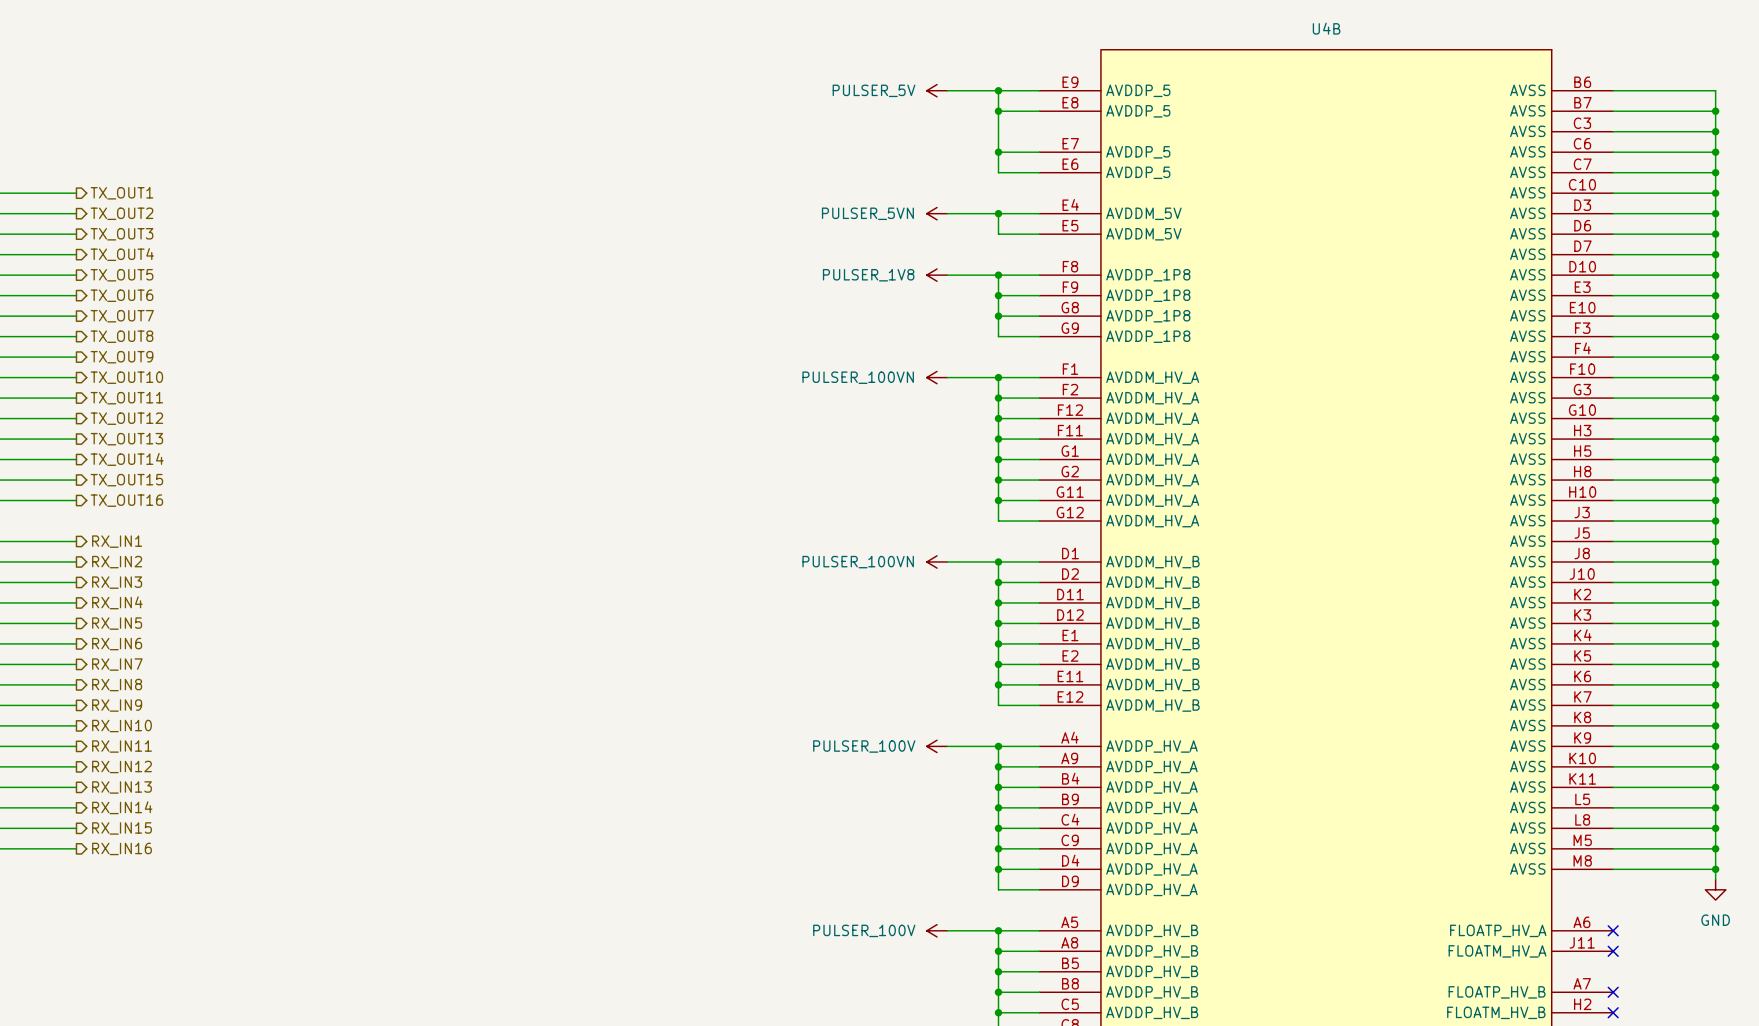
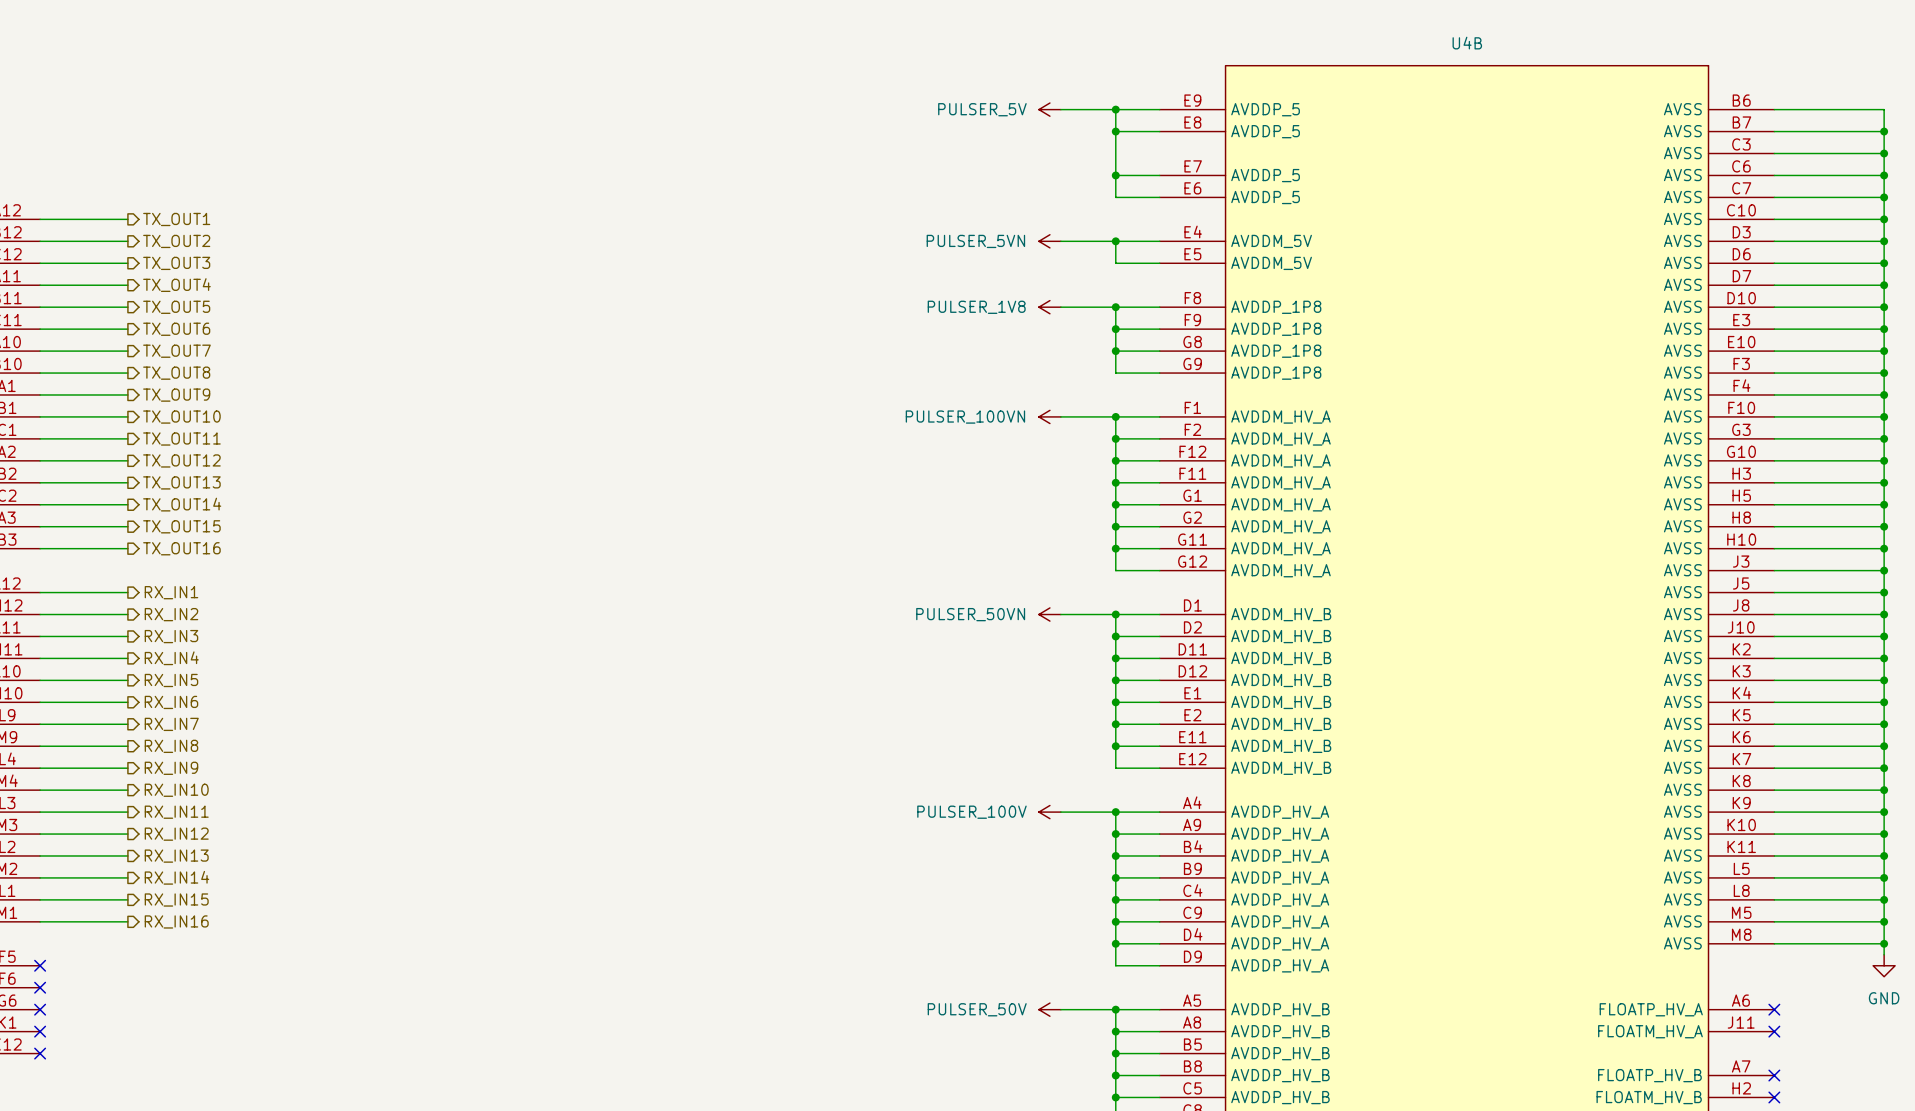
power symbol: PULSER_100VN (937, 561) -> PULSER_50VN (1049, 614)
power symbol: PULSER_100V (937, 930) -> PULSER_50V (1049, 1009)

